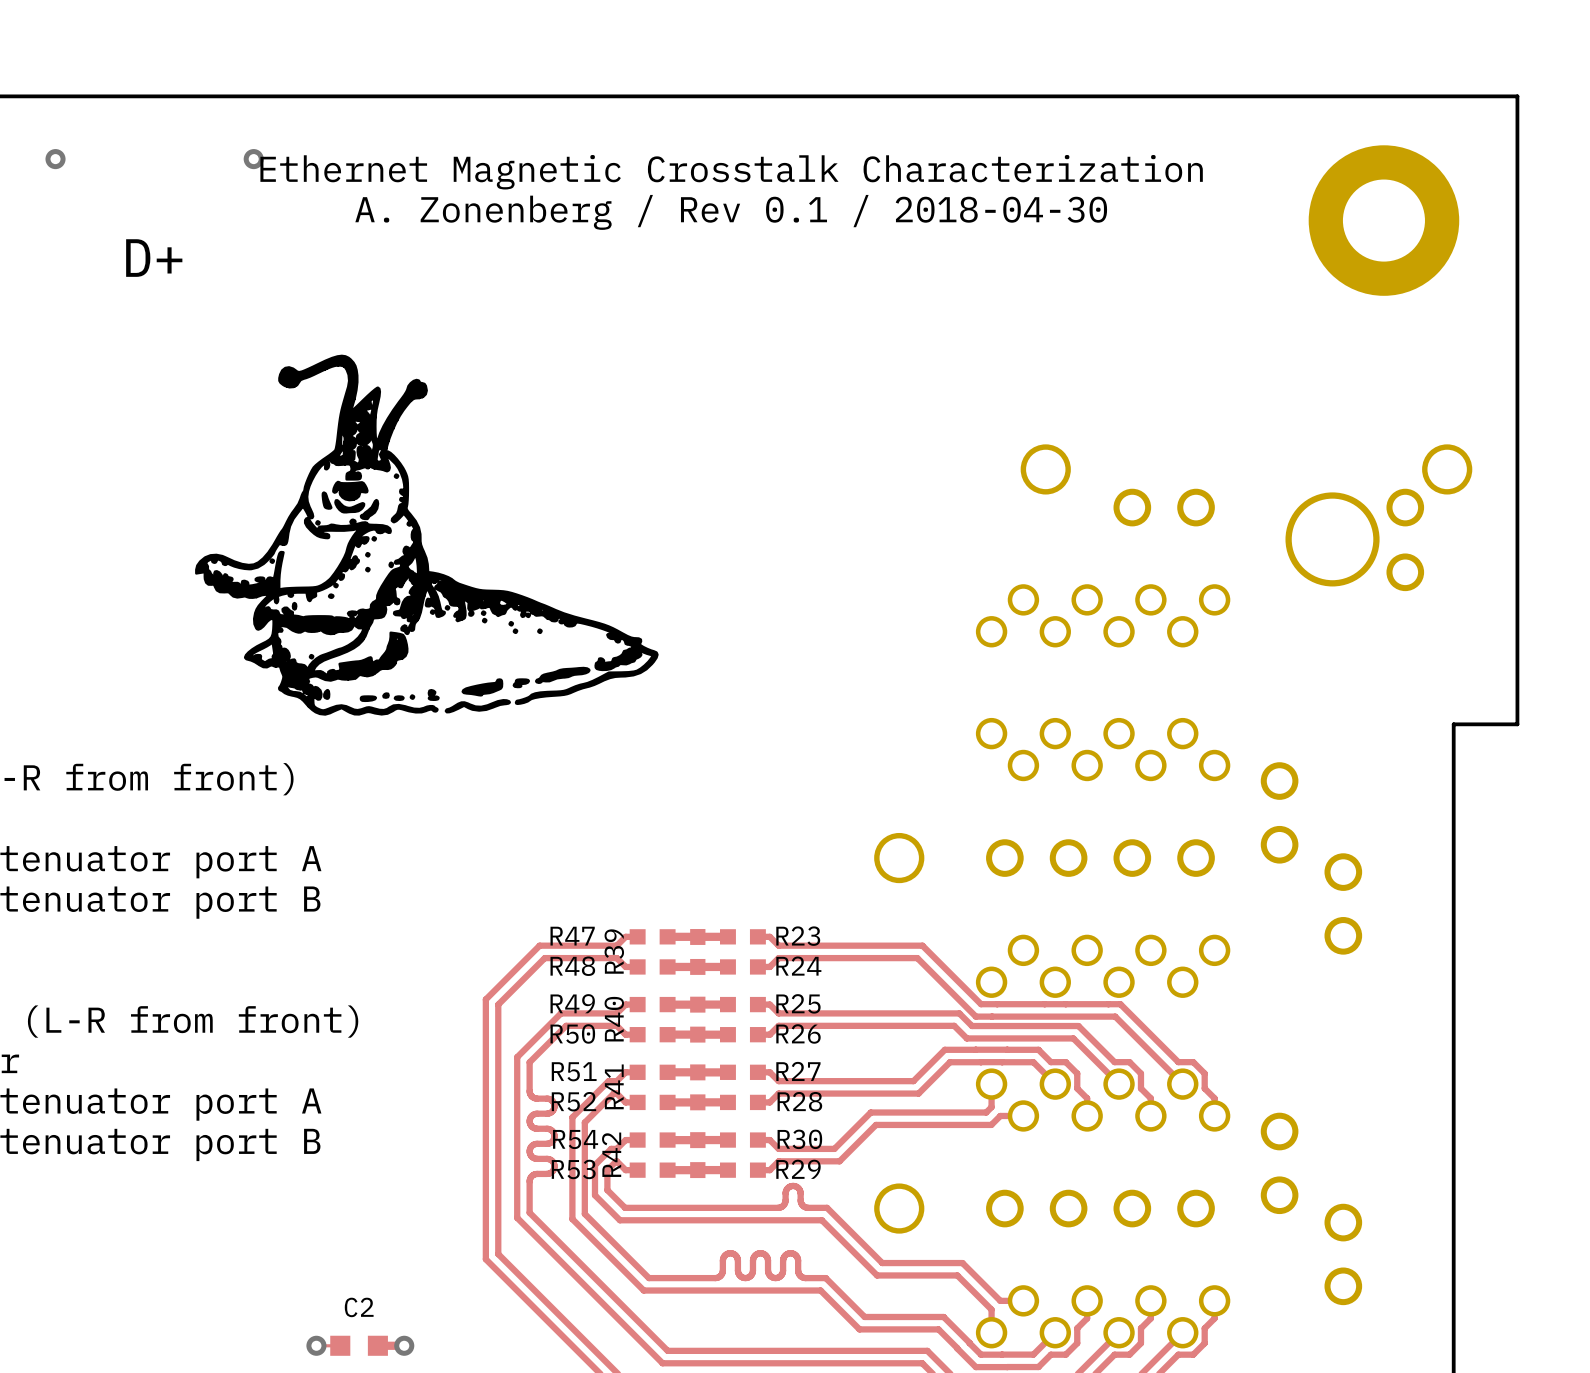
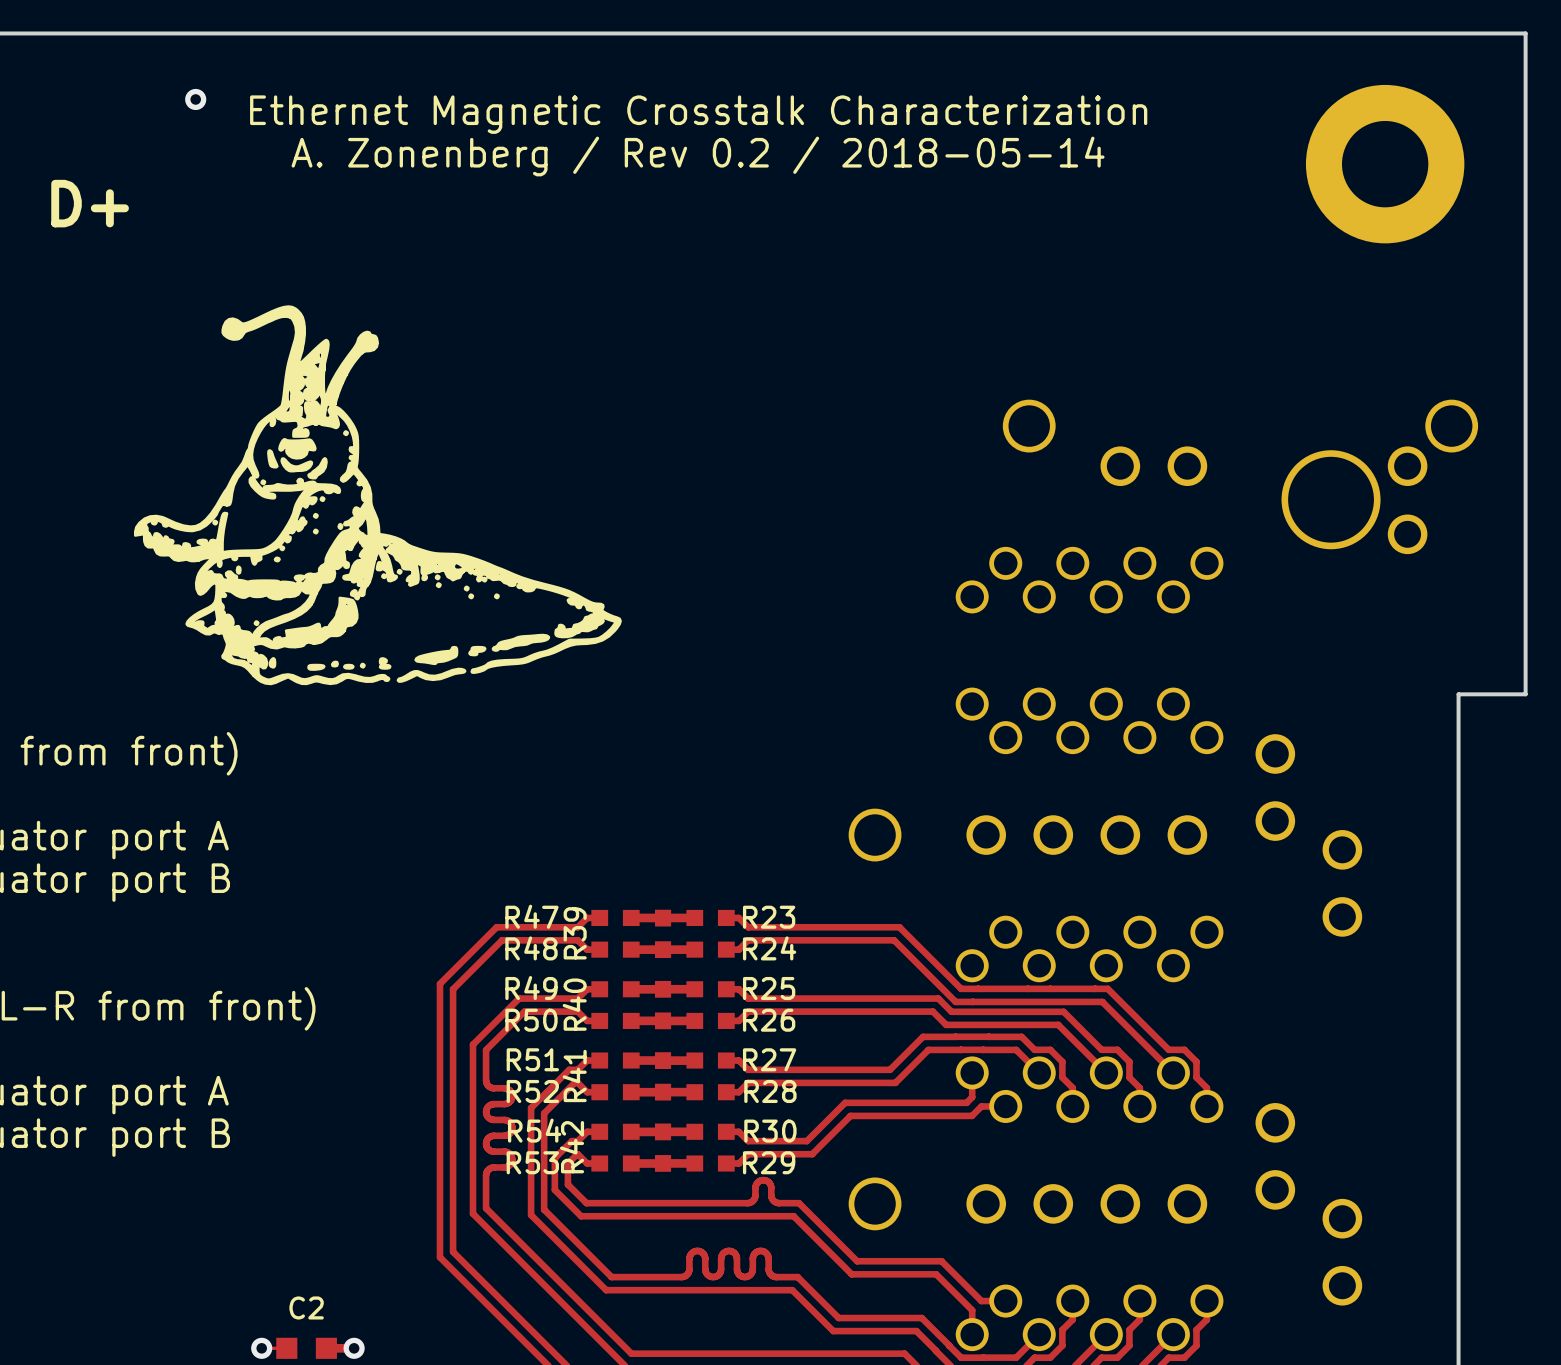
text: A. Zonenberg / Rev 0.1 / 2018-04-30 (731, 212) -> A. Zonenberg / Rev 0.2 / 2018-05-14 (698, 156)

